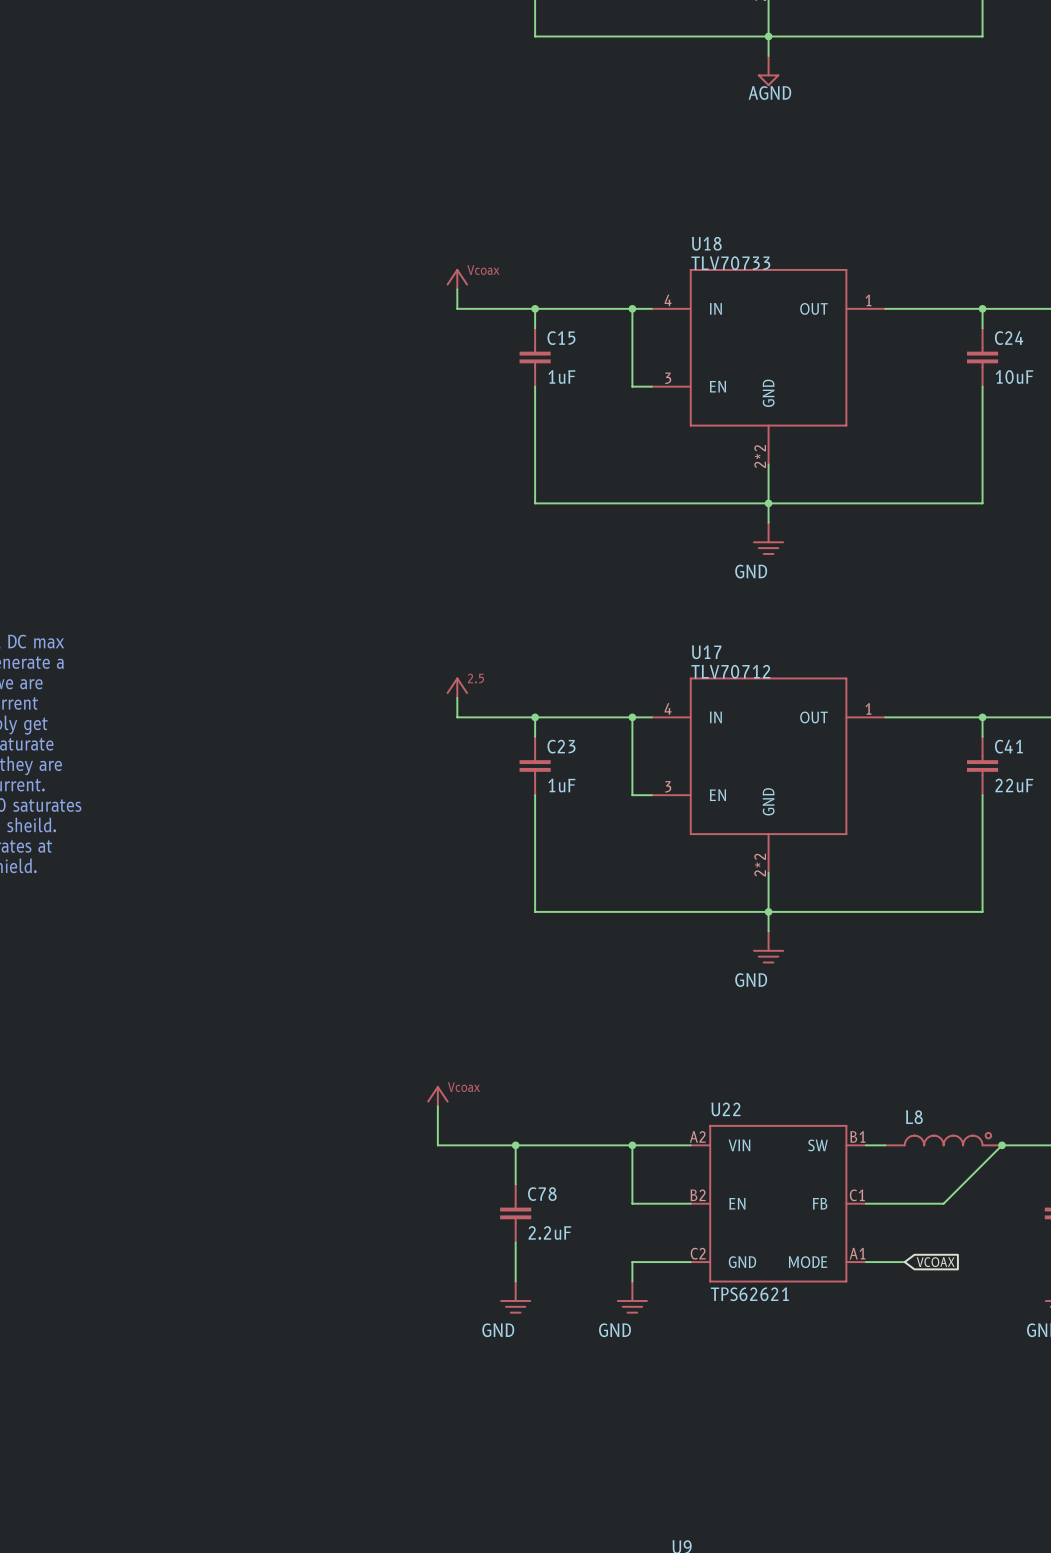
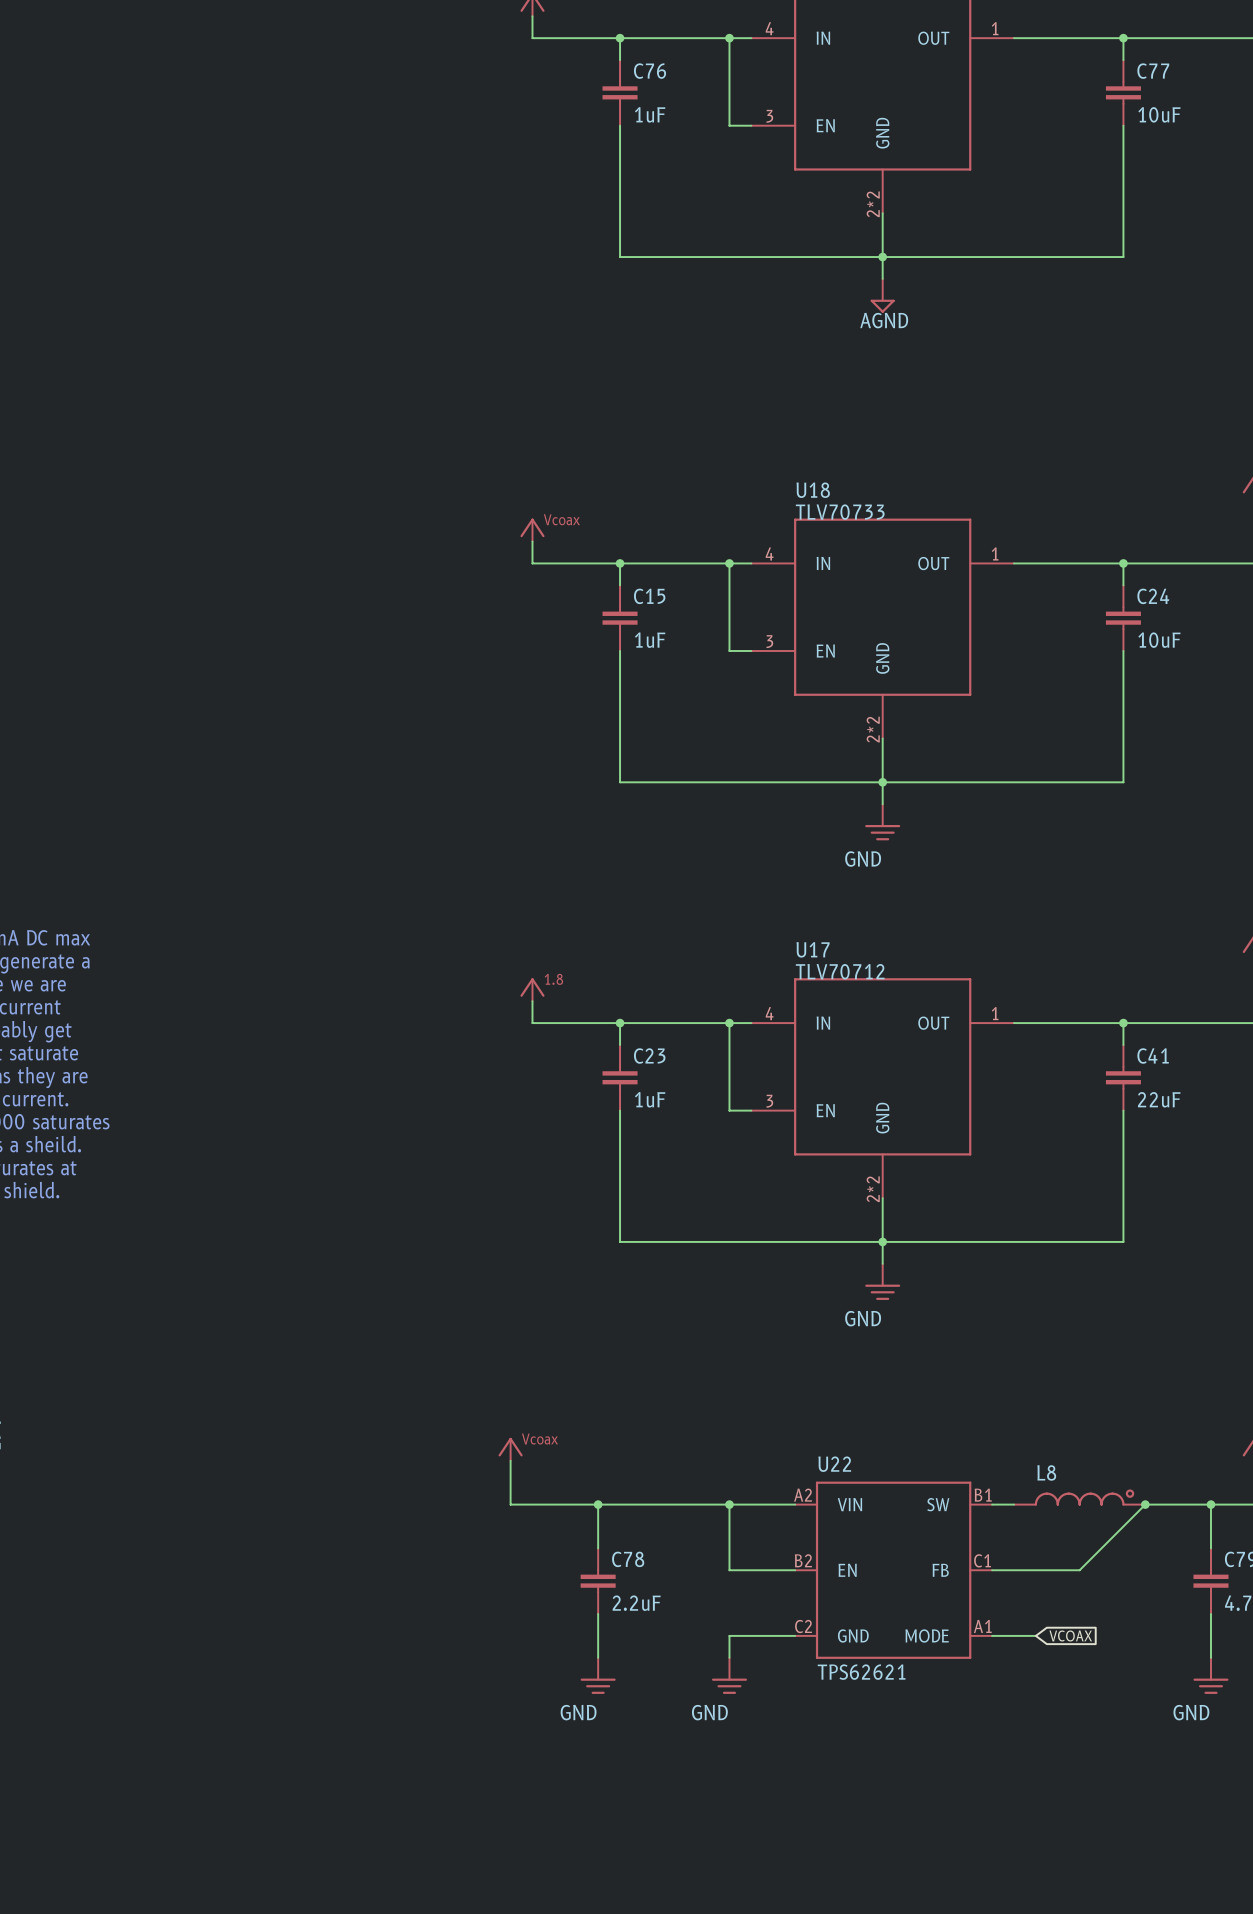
power symbol text: 2.5 (475, 678) -> 1.8 (553, 979)

